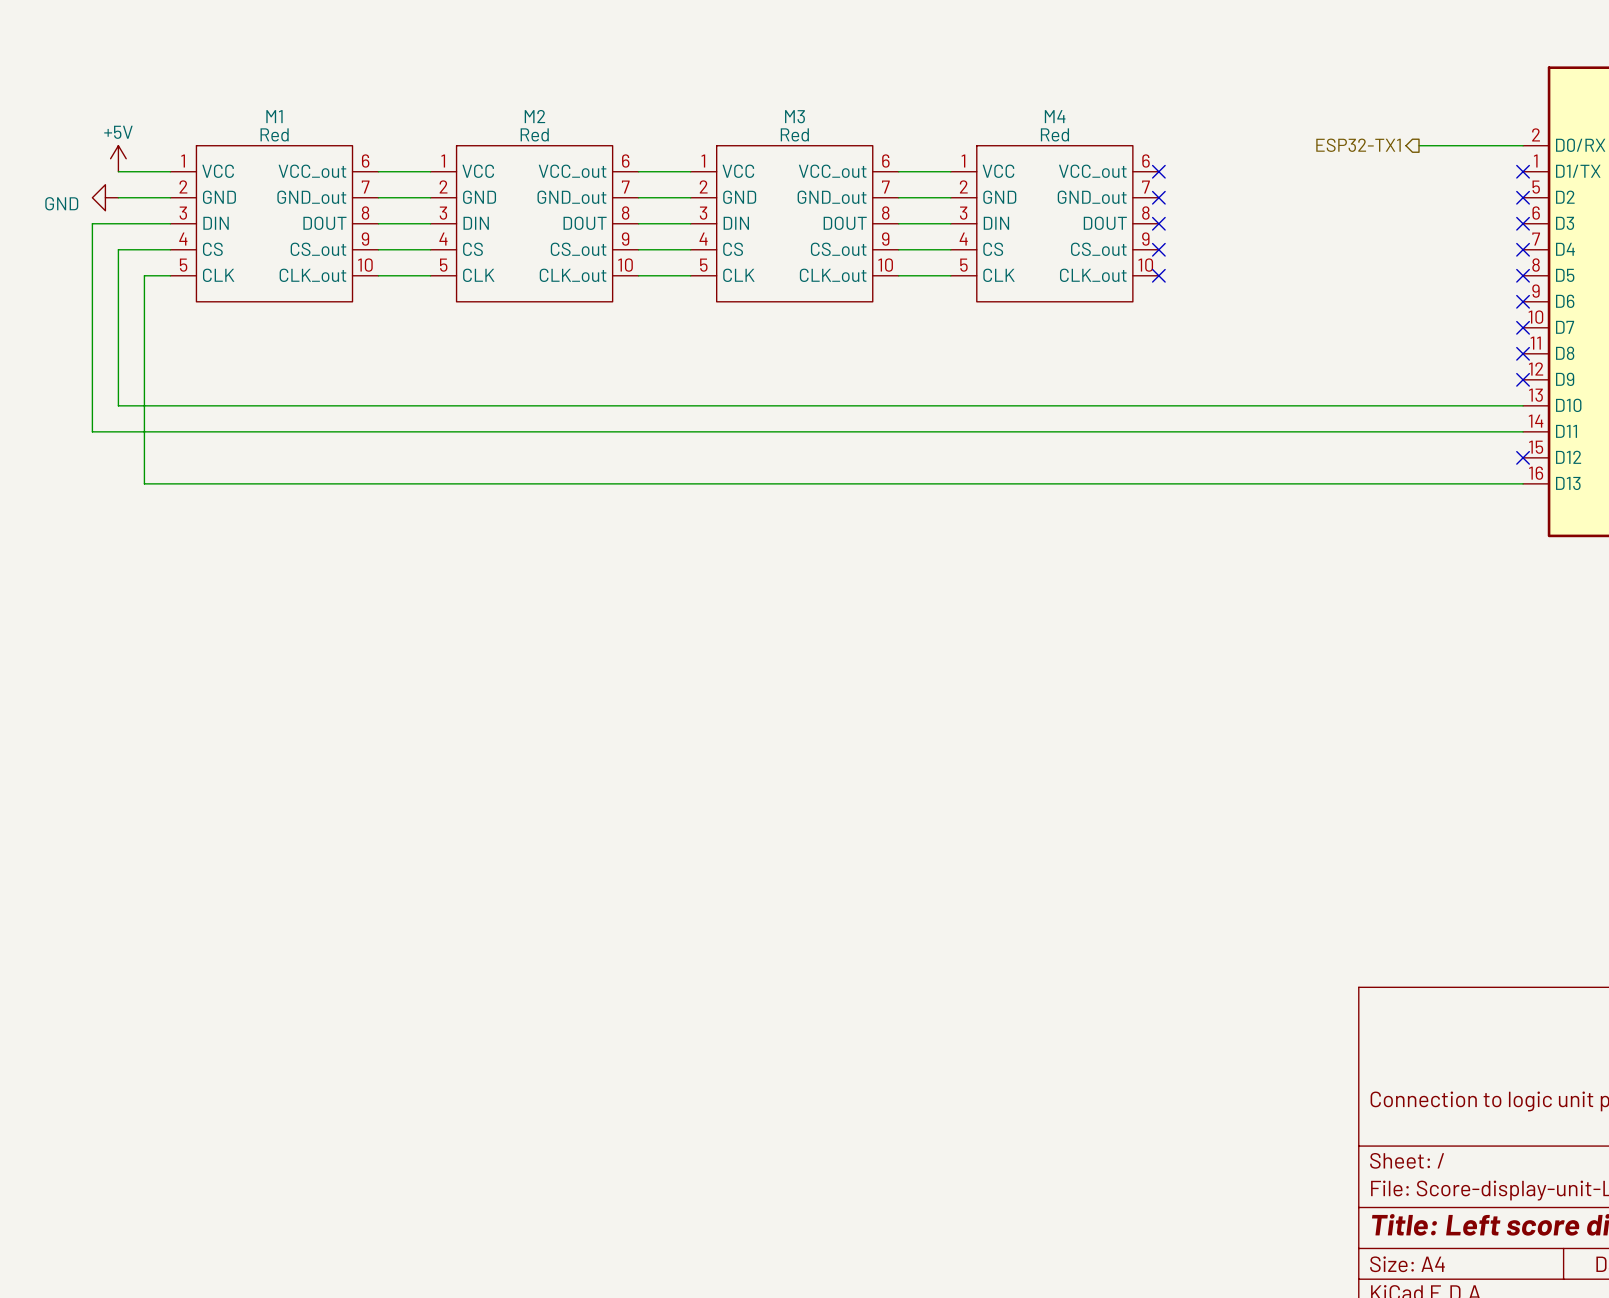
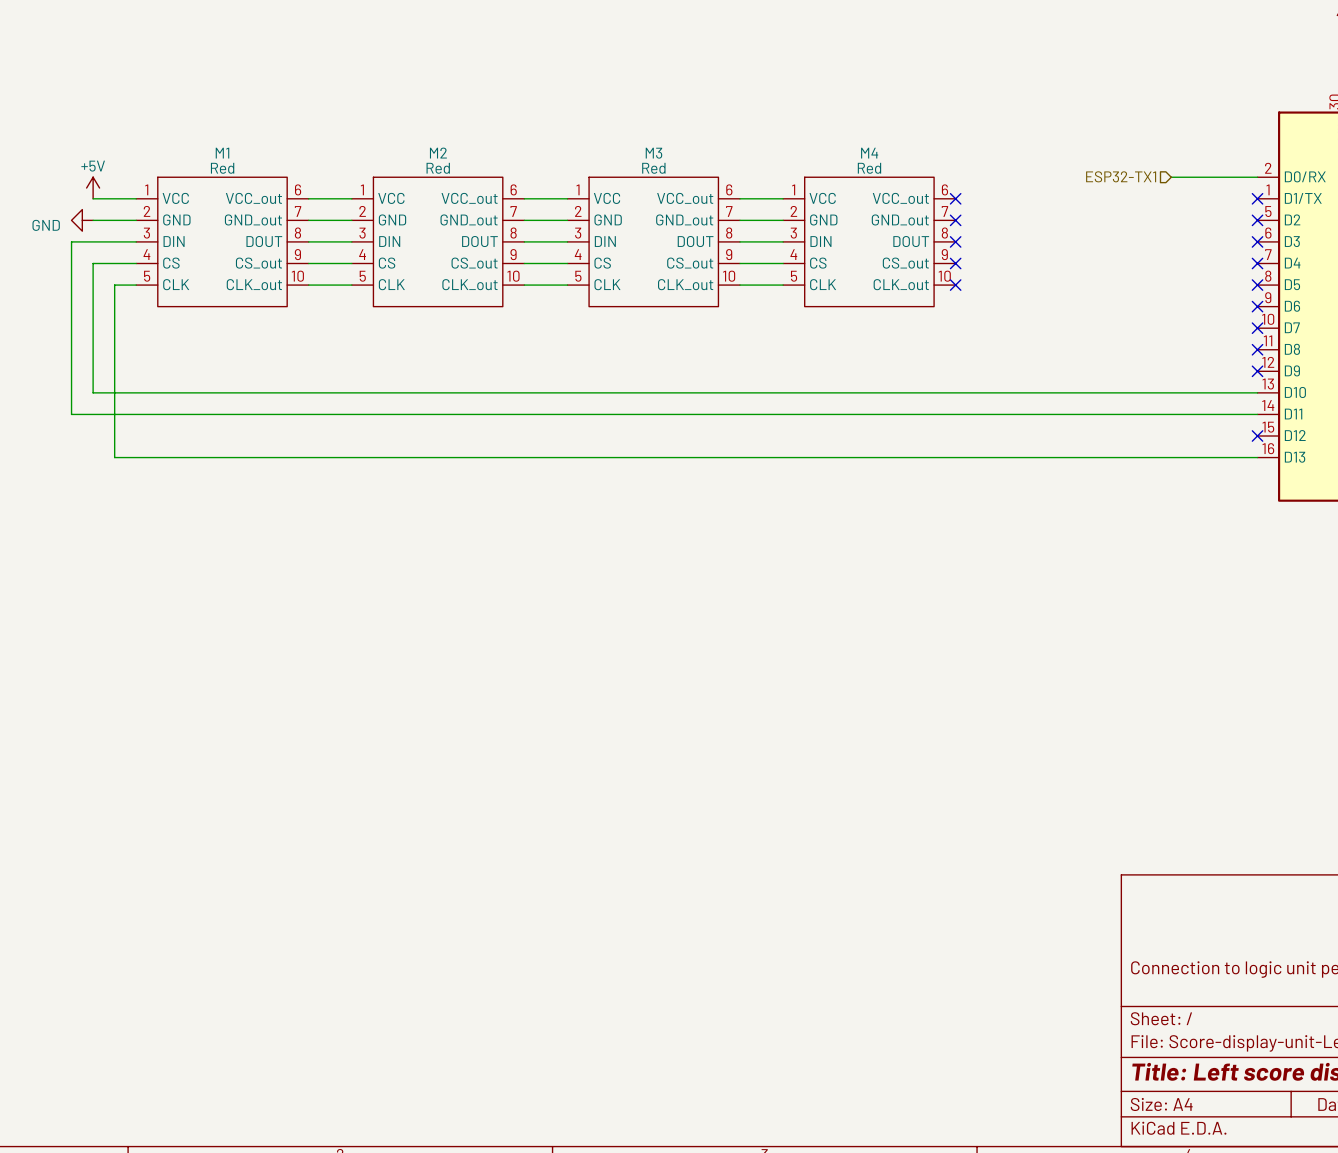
hierarchical label shape: output (1358, 145) -> input (1121, 176)

